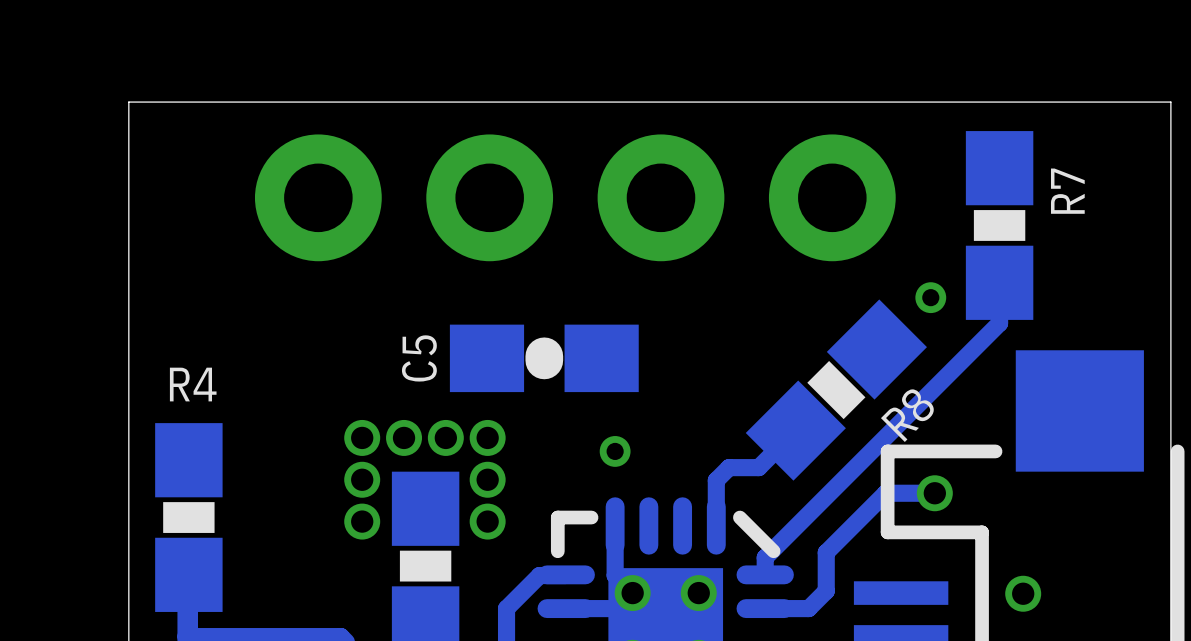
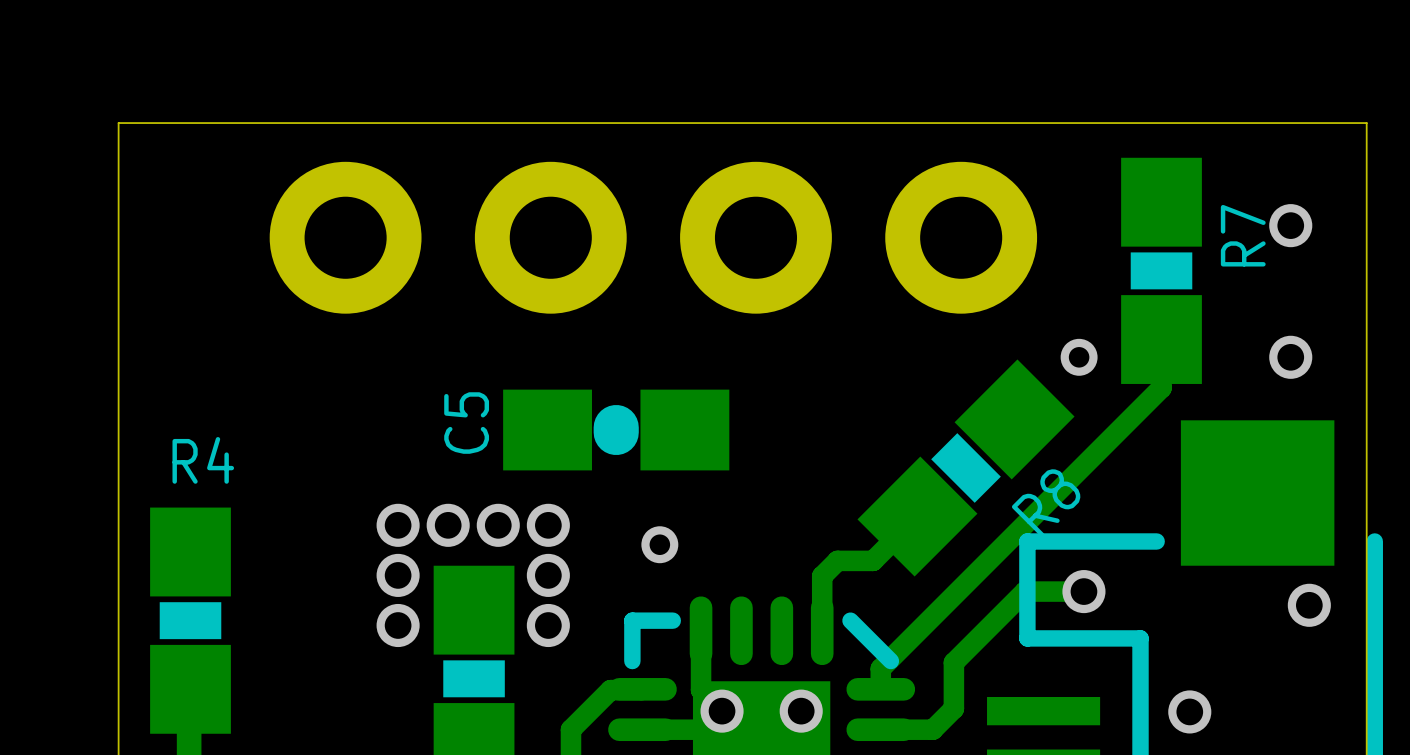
via: none -> (1290, 225)
via: none -> (1290, 357)
via position: (615, 451) -> (659, 544)
via: none -> (1309, 605)

